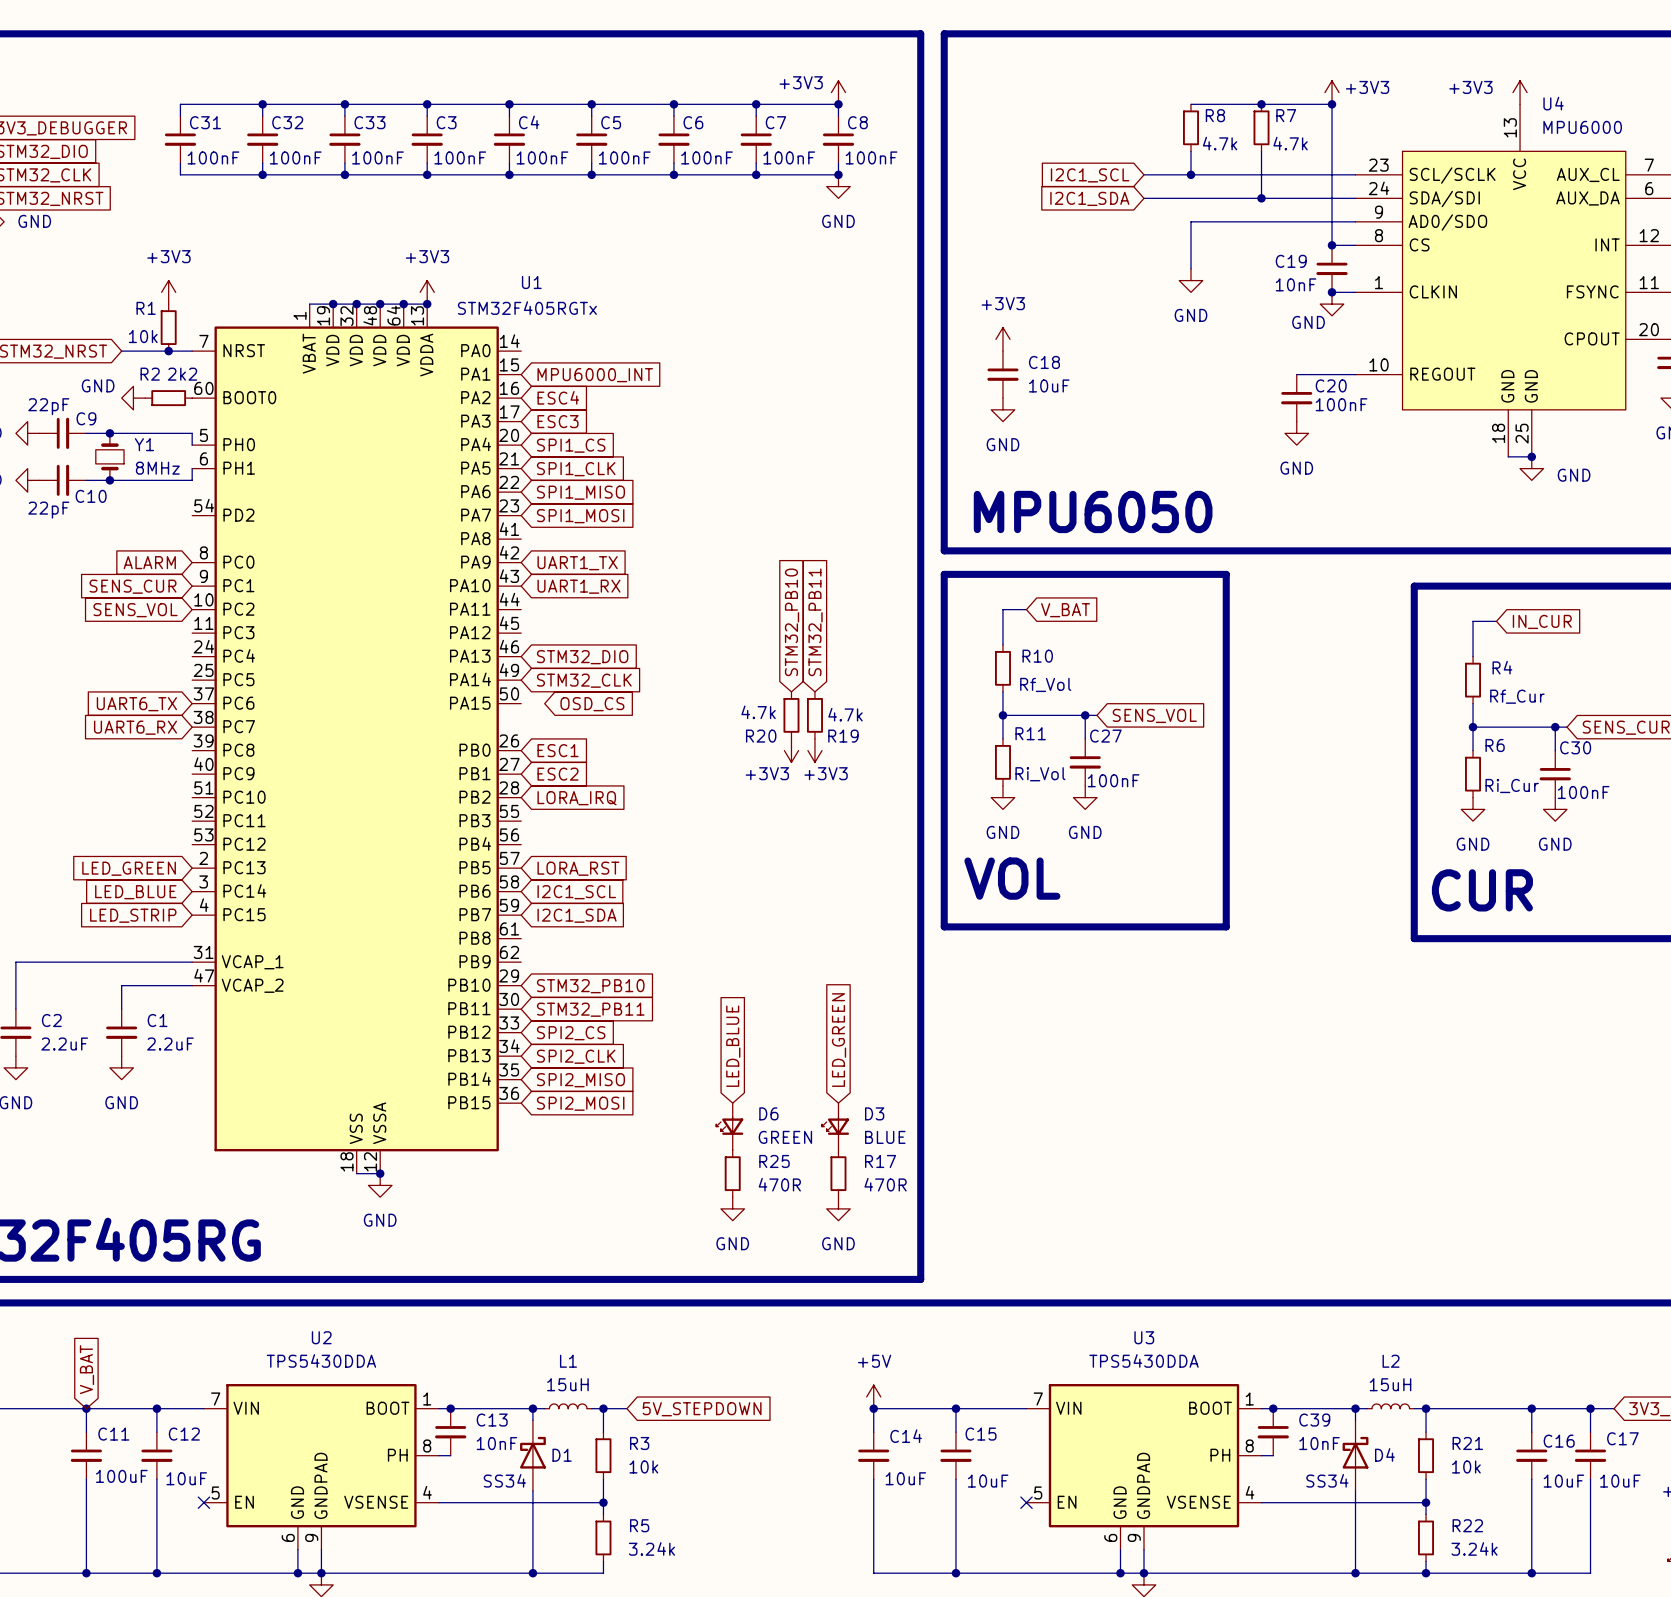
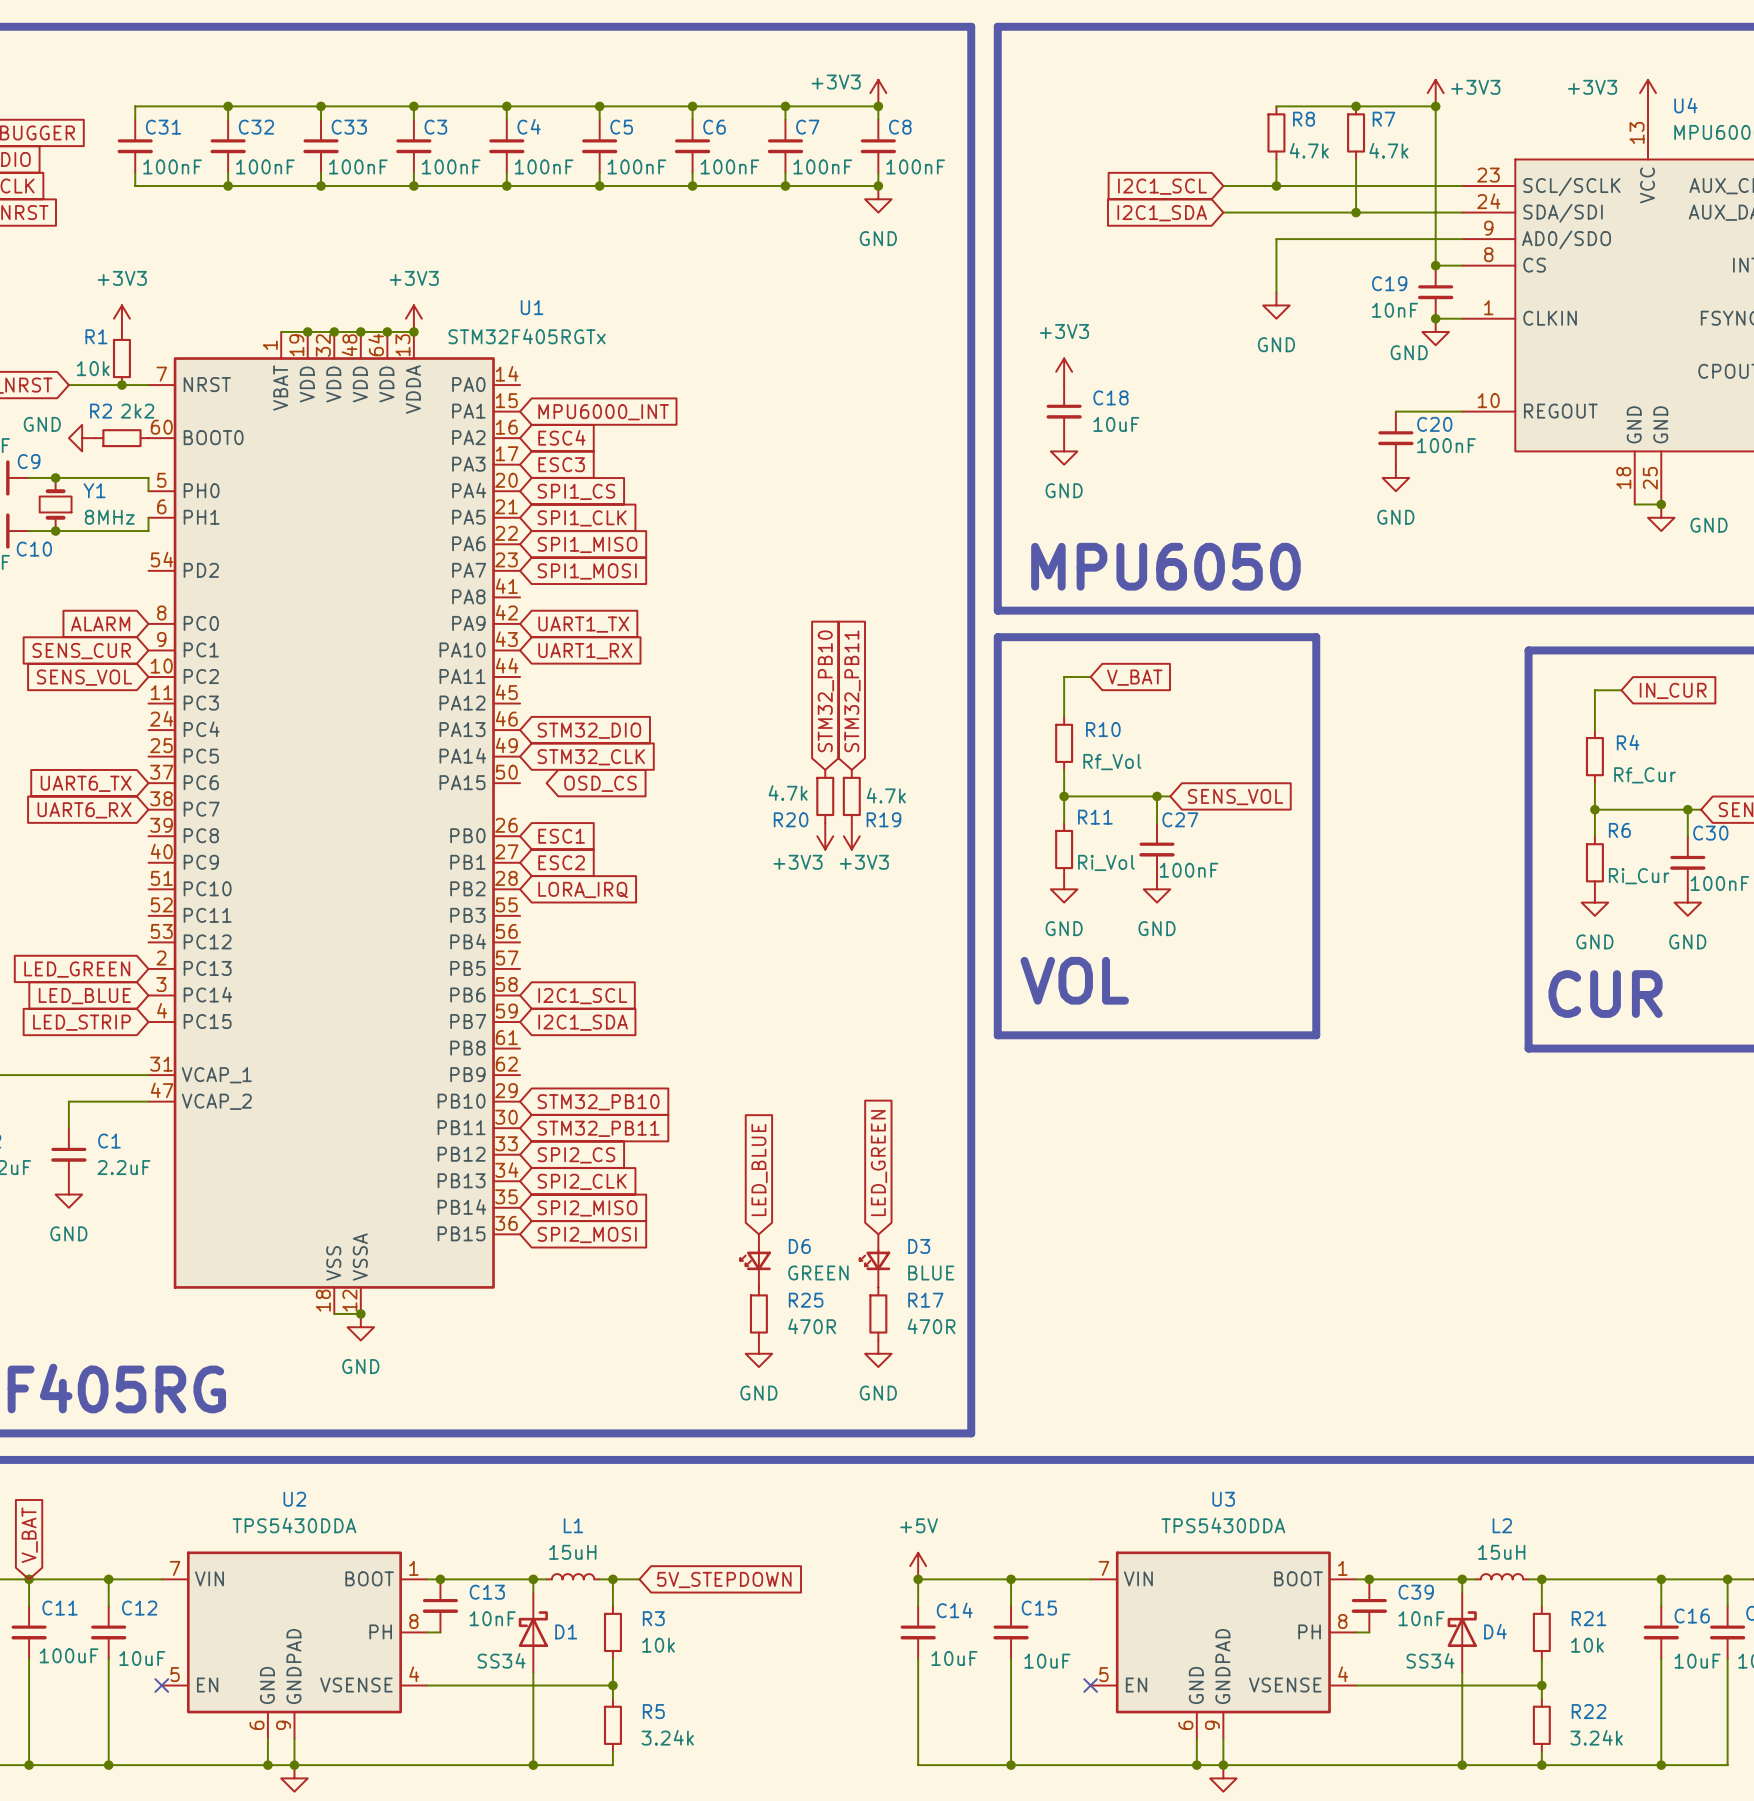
global label: LORA_RST (578, 868) -> none

